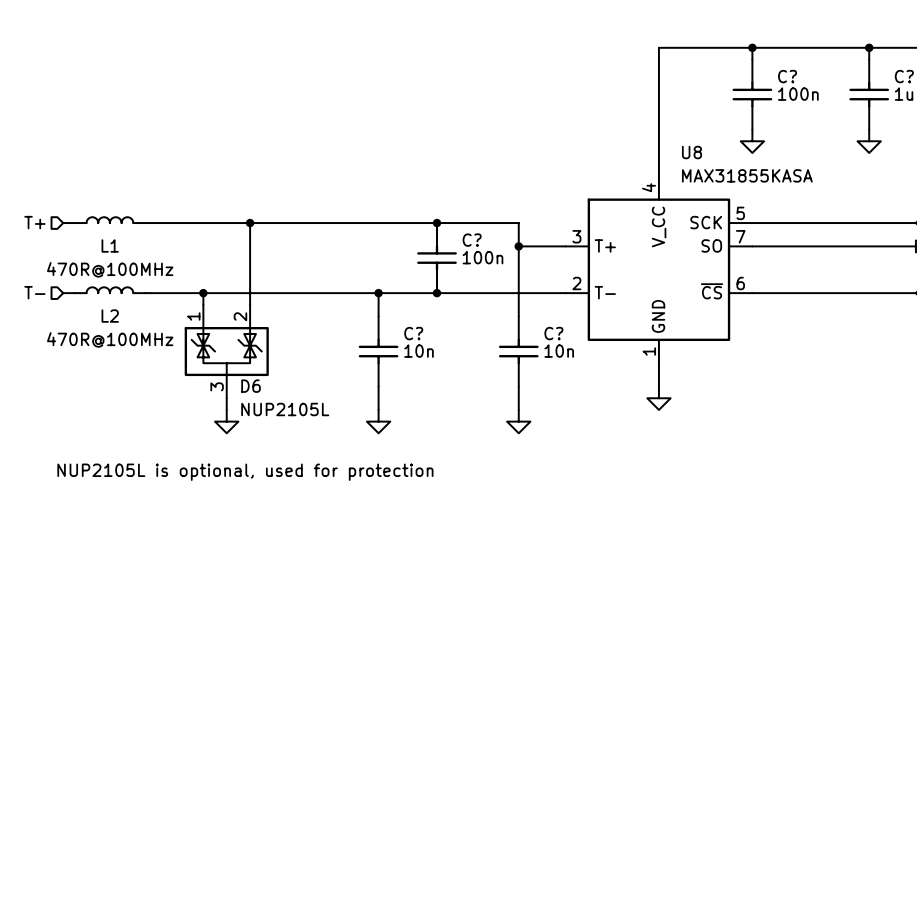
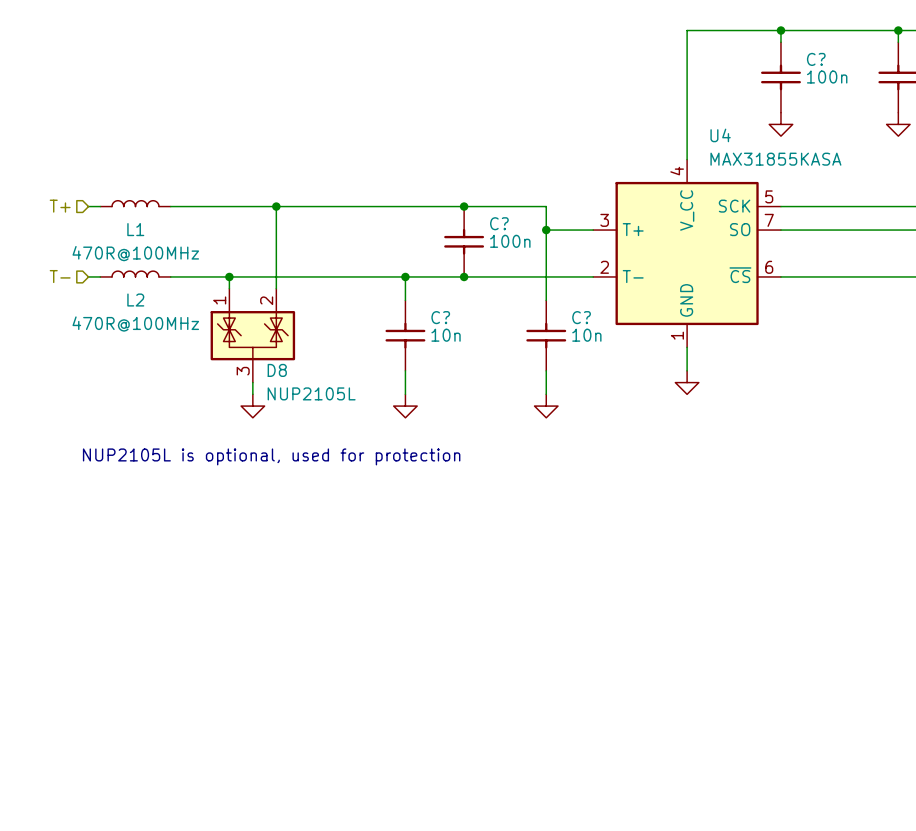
U8 name: U8 (692, 152) -> U4 (720, 135)
D6 name: D6 (251, 386) -> D8 (277, 370)

